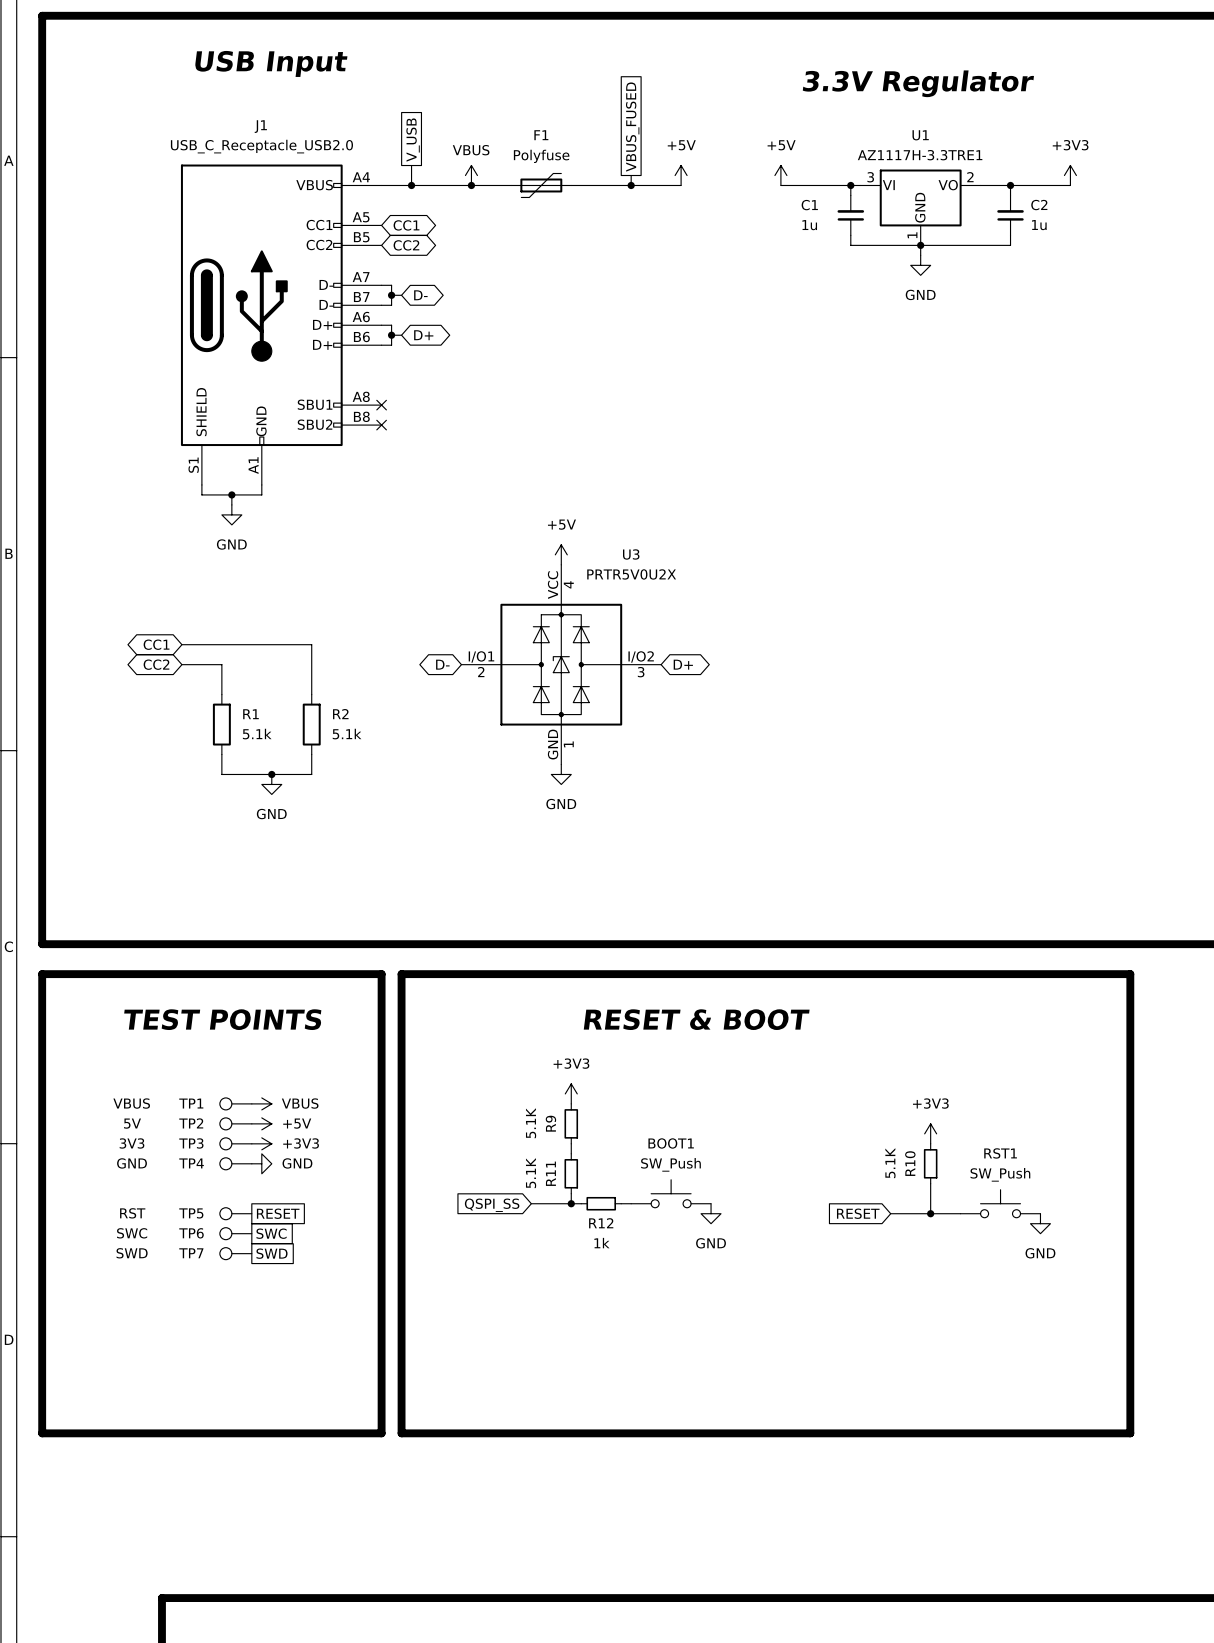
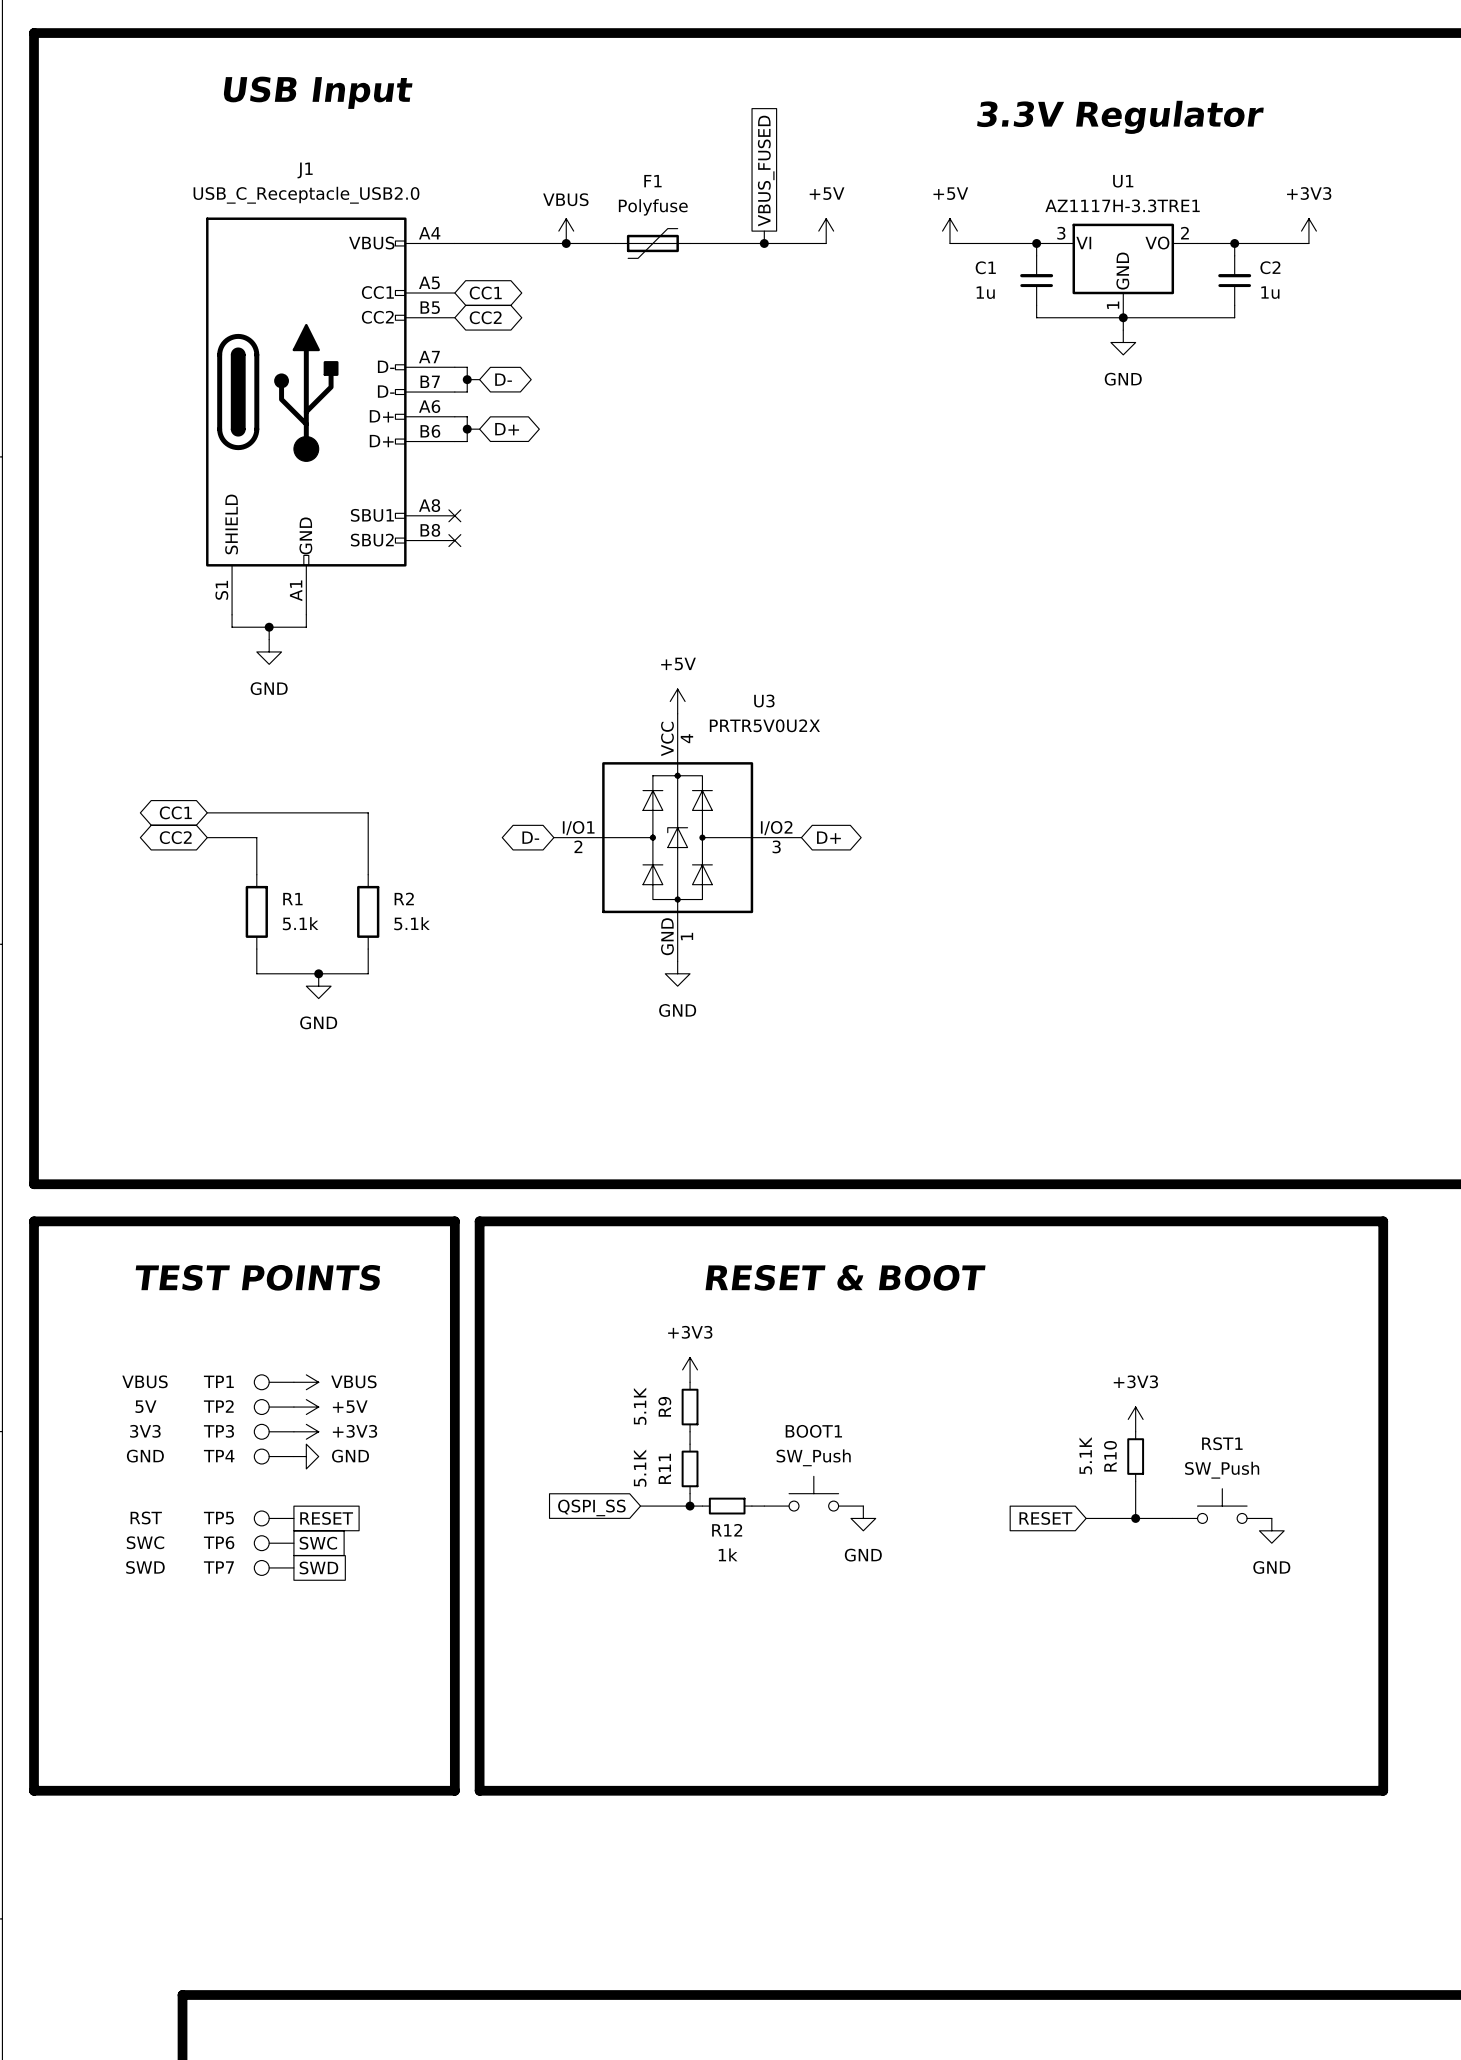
global label: V_USB (413, 140) -> none
wire: (411, 165) (411, 185) -> none
junction: (411, 185) -> none

